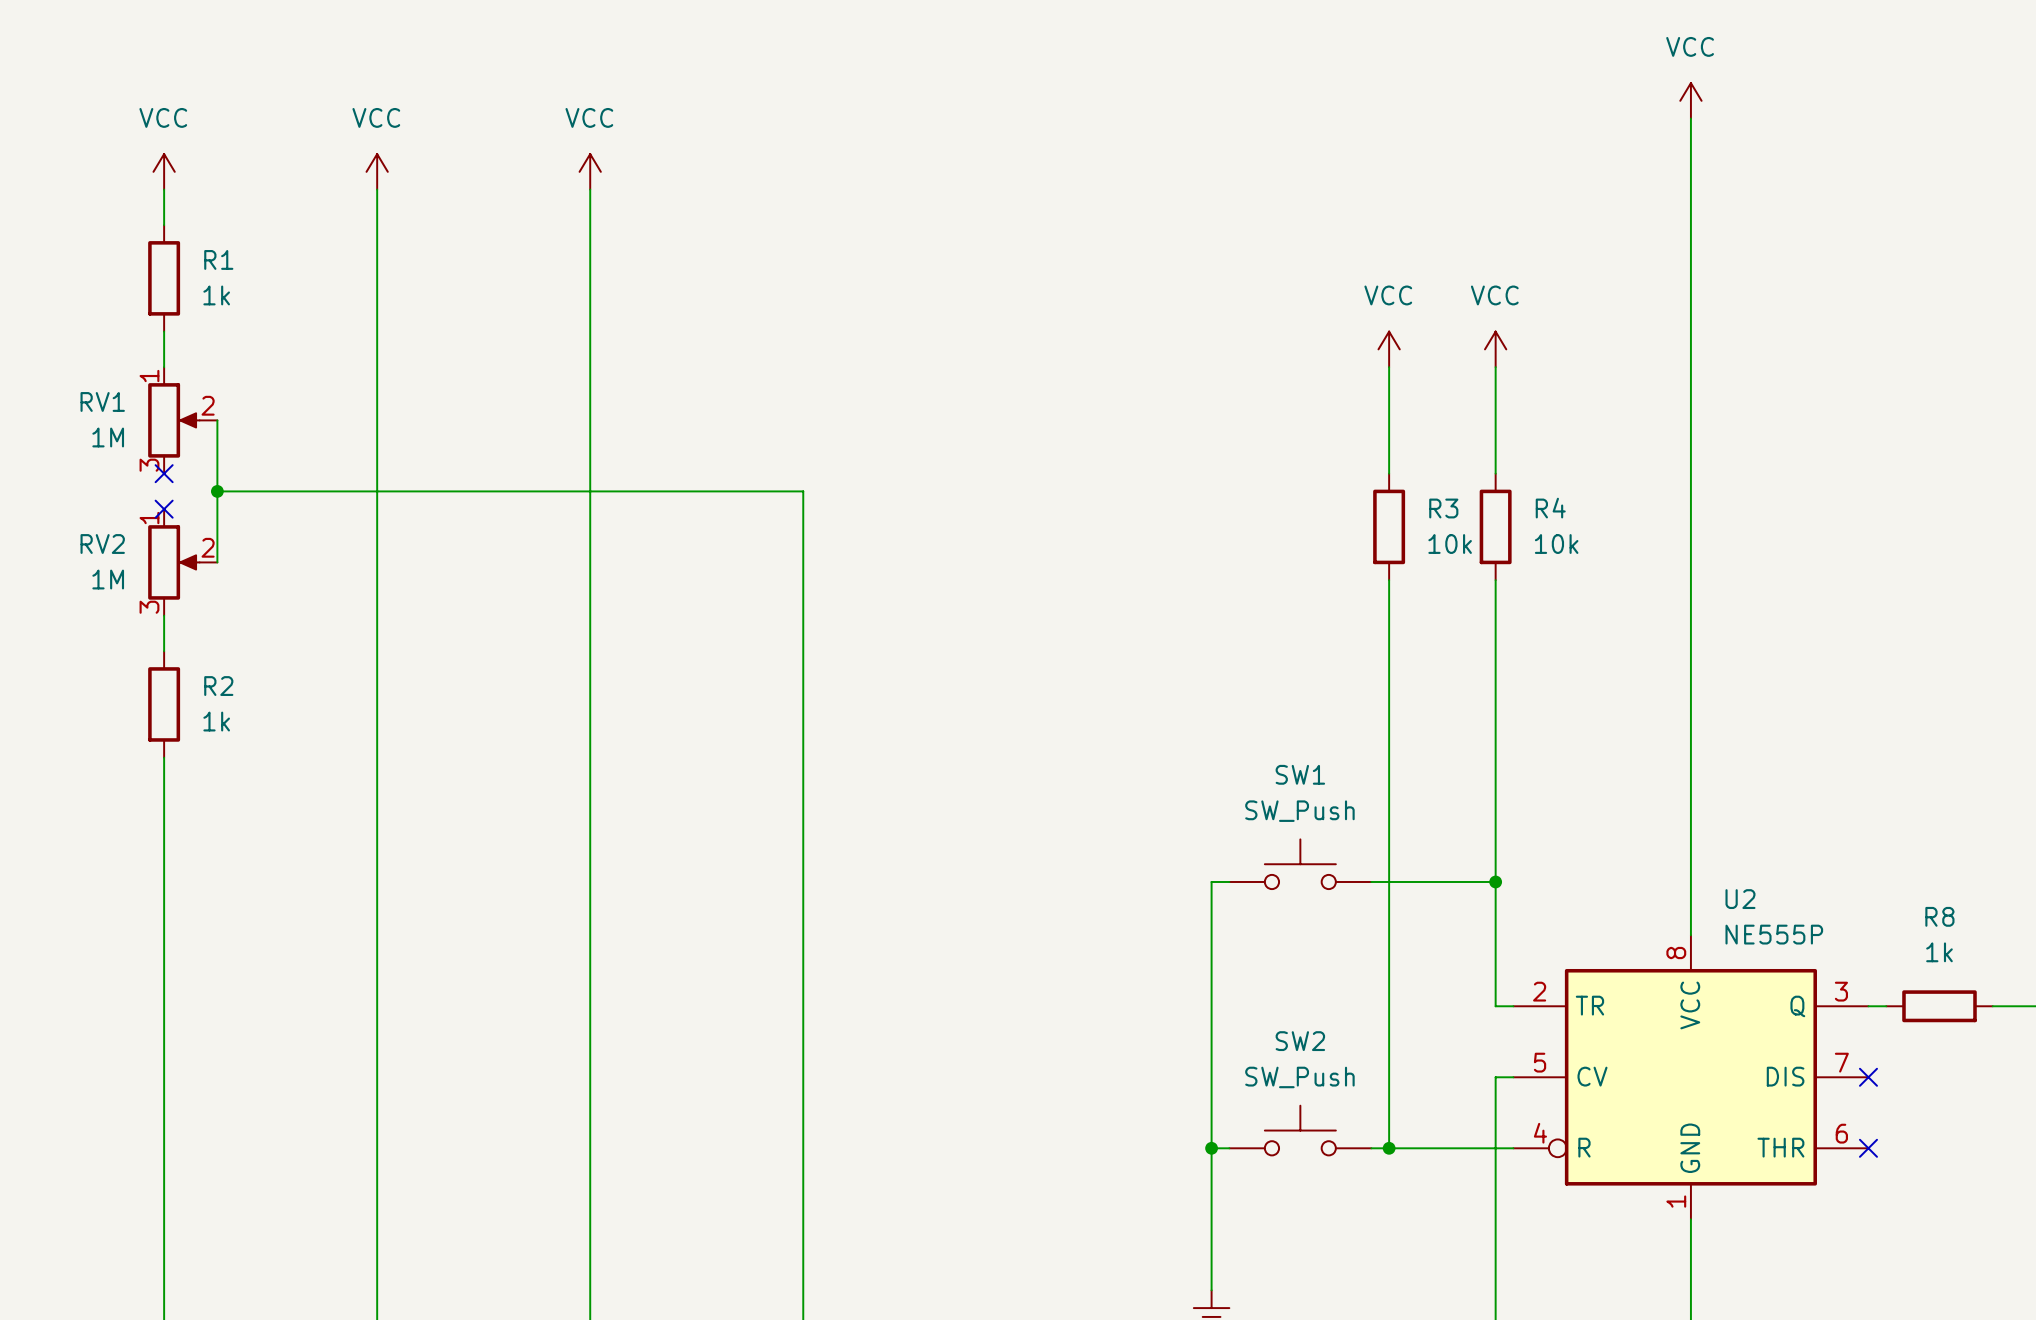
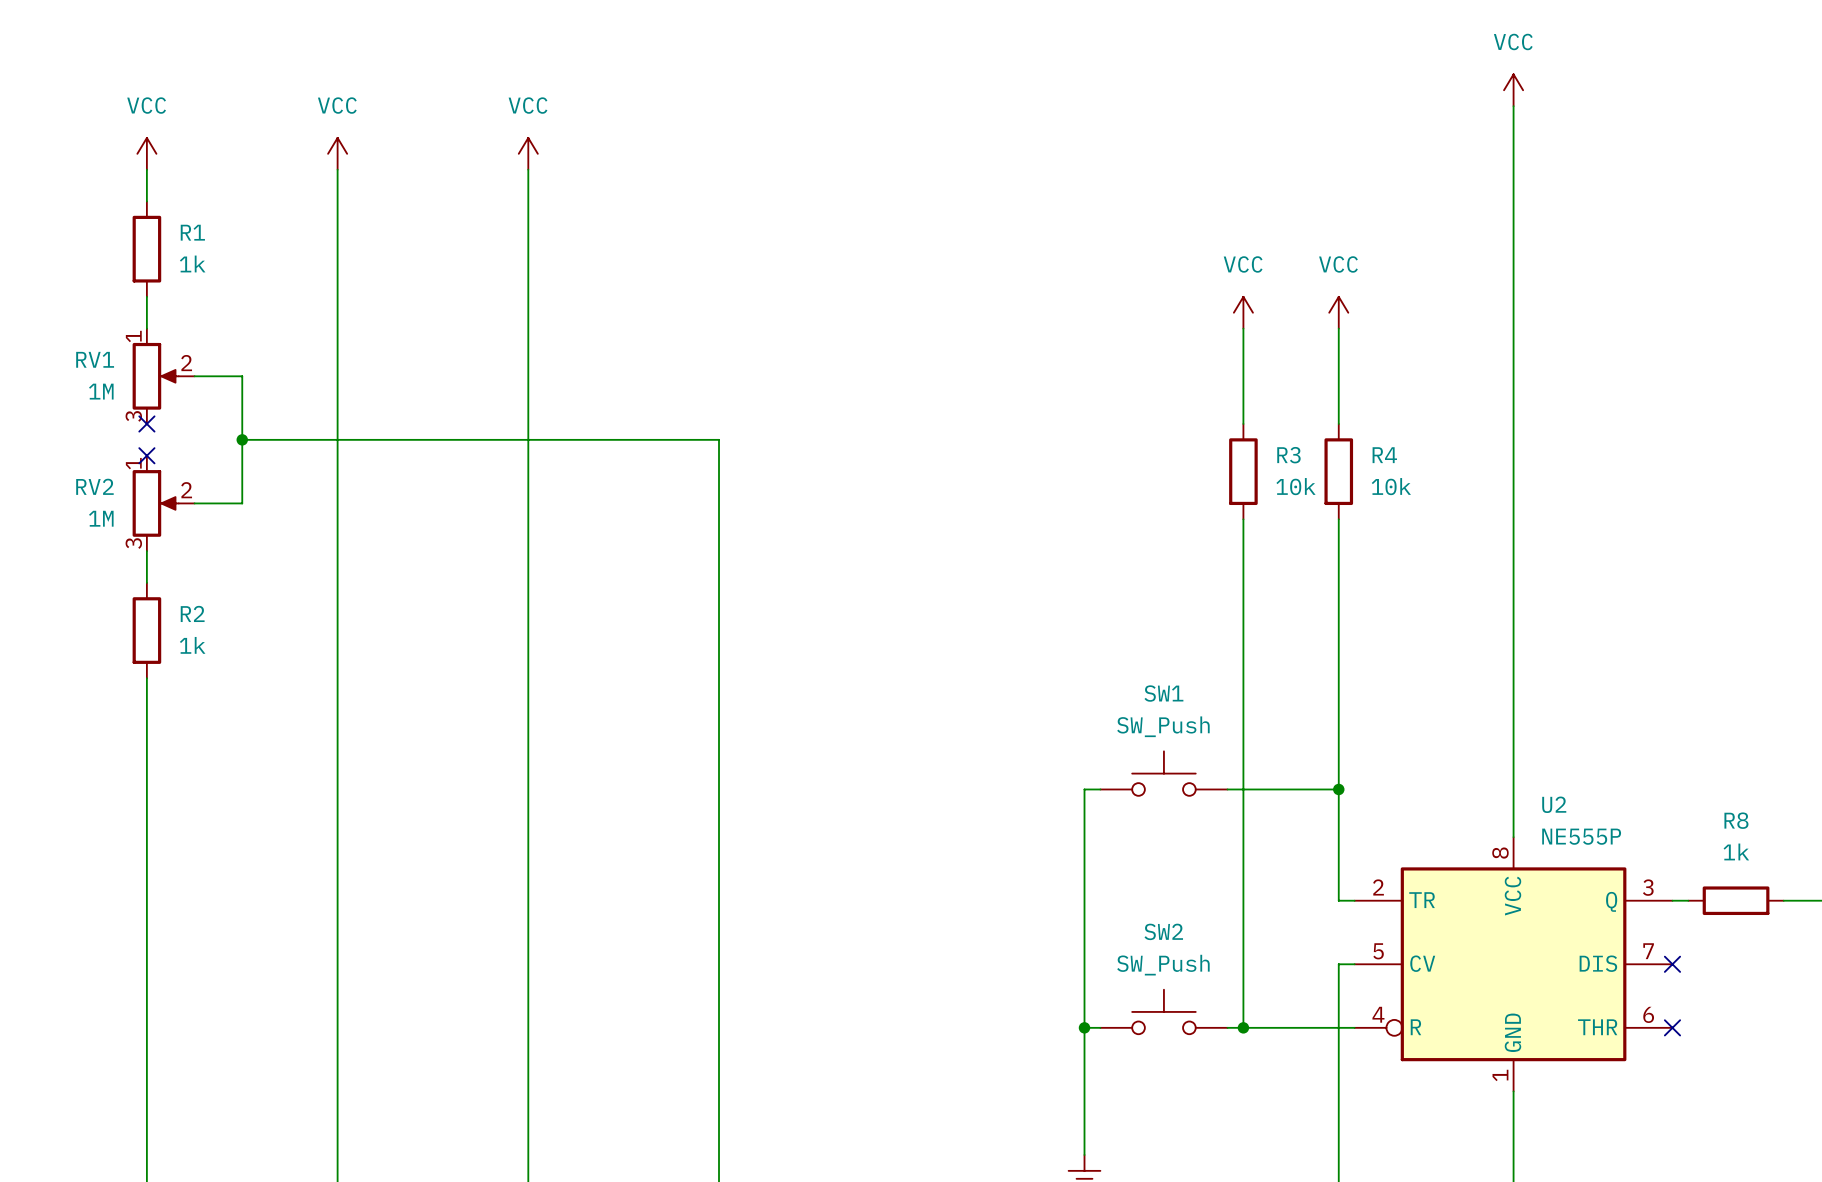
wire: (217, 420) (217, 562) -> (194, 376) (242, 376) (242, 503) (194, 503)
wire: (217, 491) (270, 491) -> none
junction position: (217, 491) -> (242, 439)

